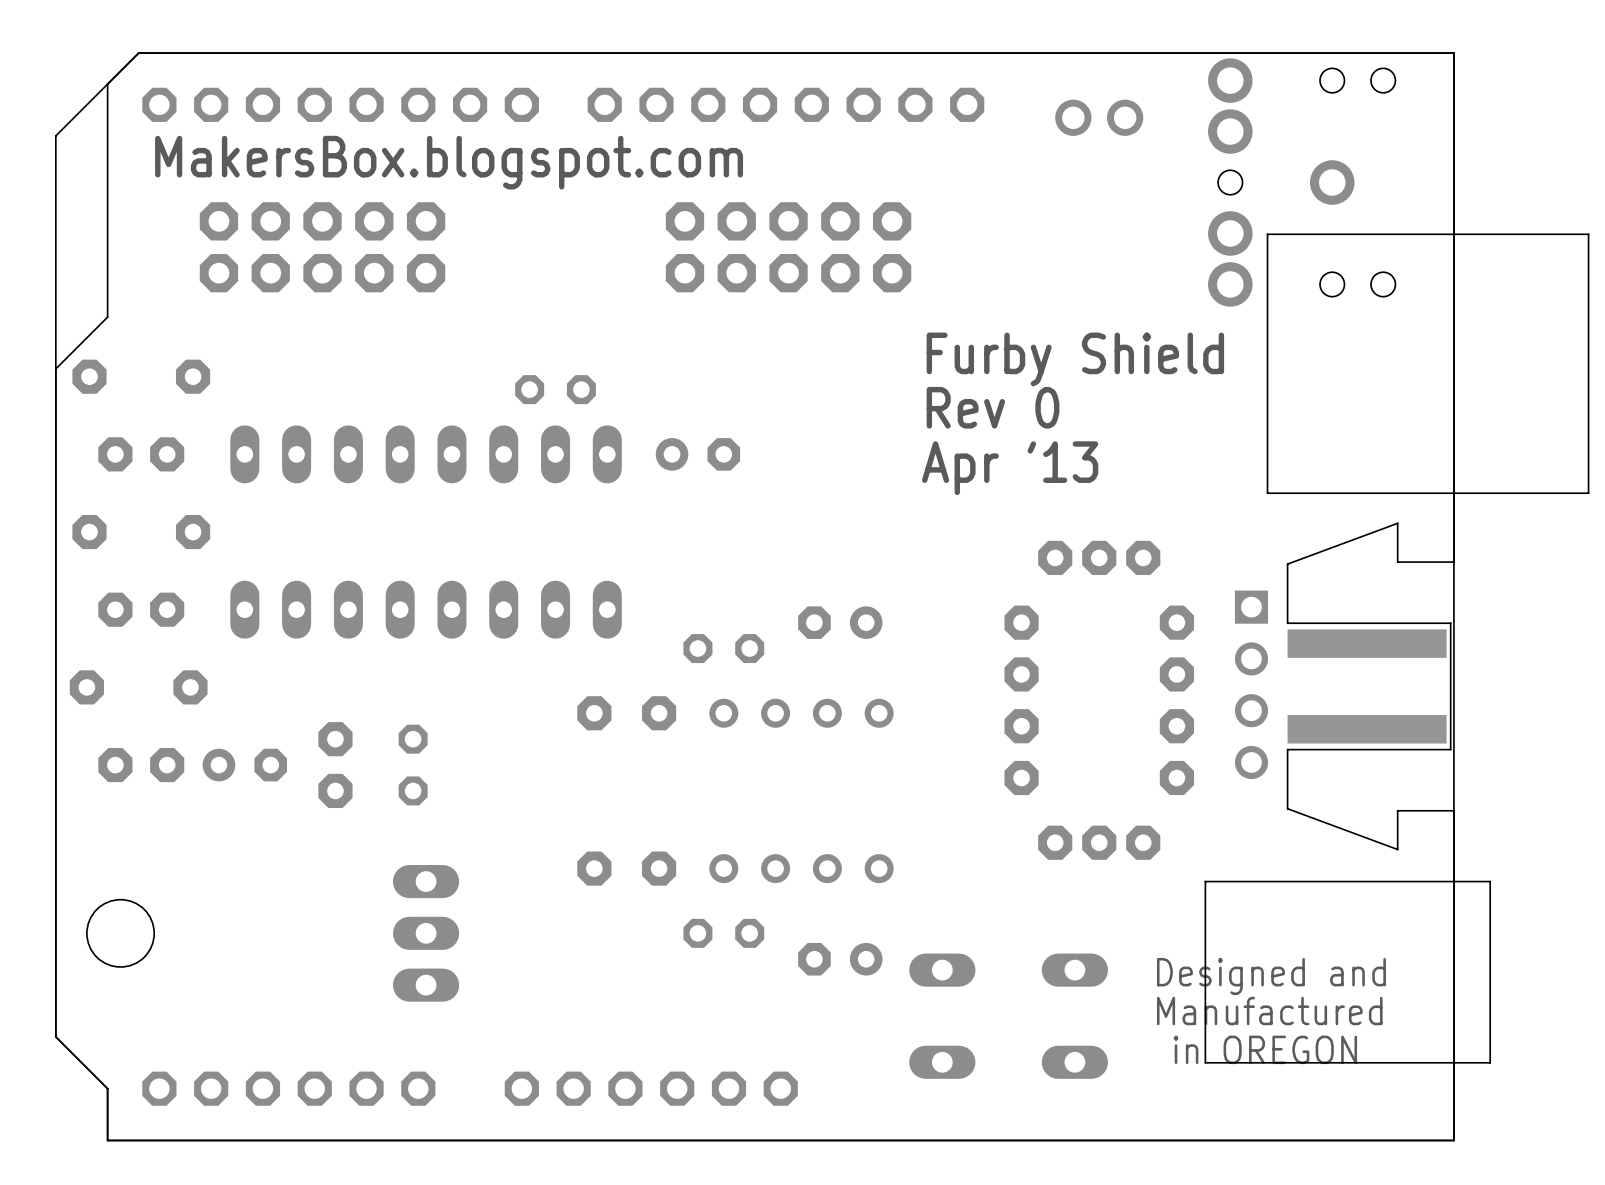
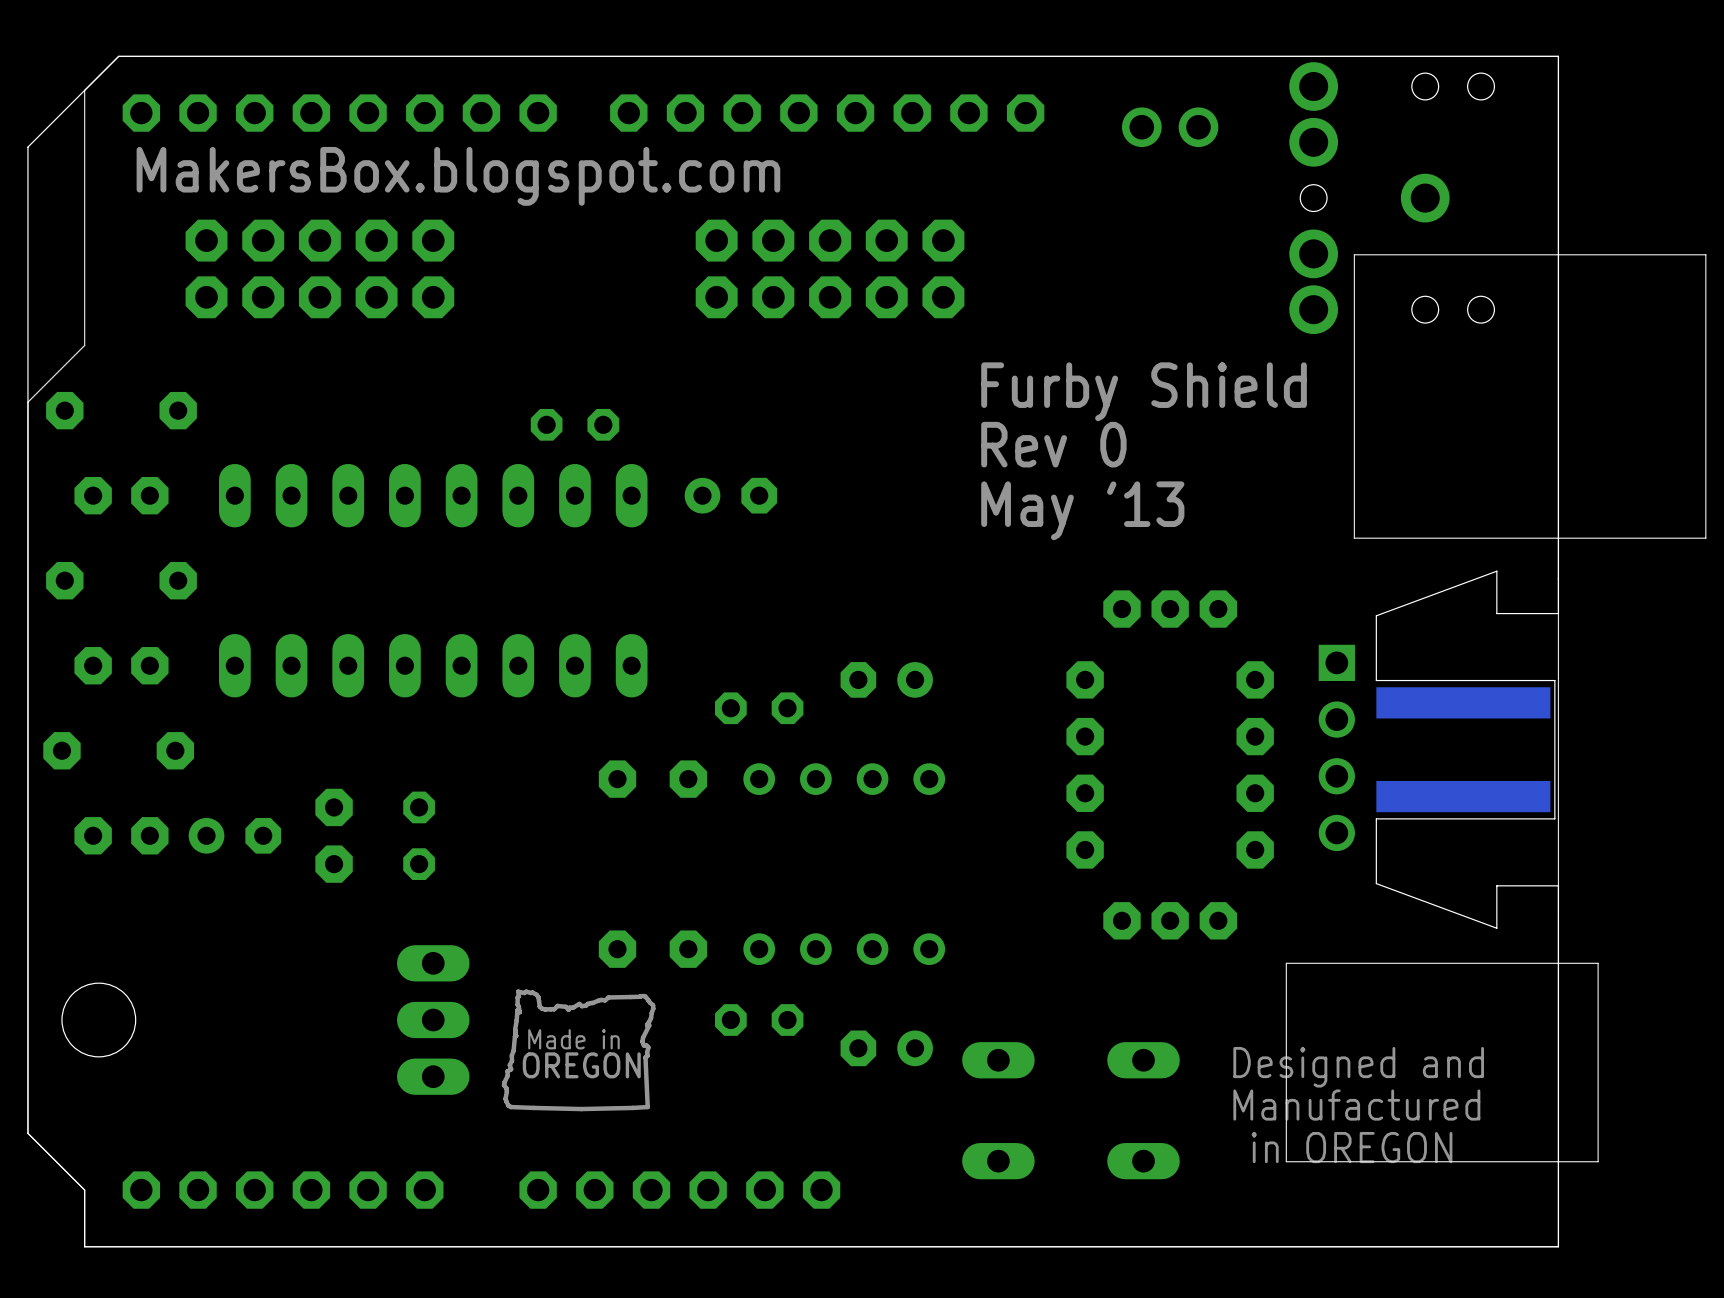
text: Apr '13 (1010, 468) -> May '13 (1082, 510)
drawing: none -> [501, 989, 656, 1112]

